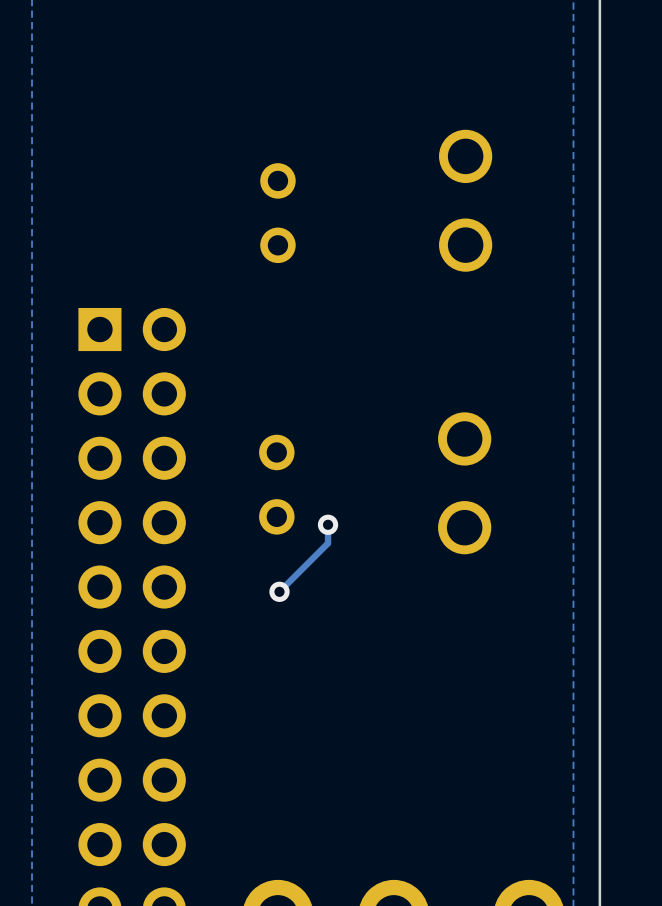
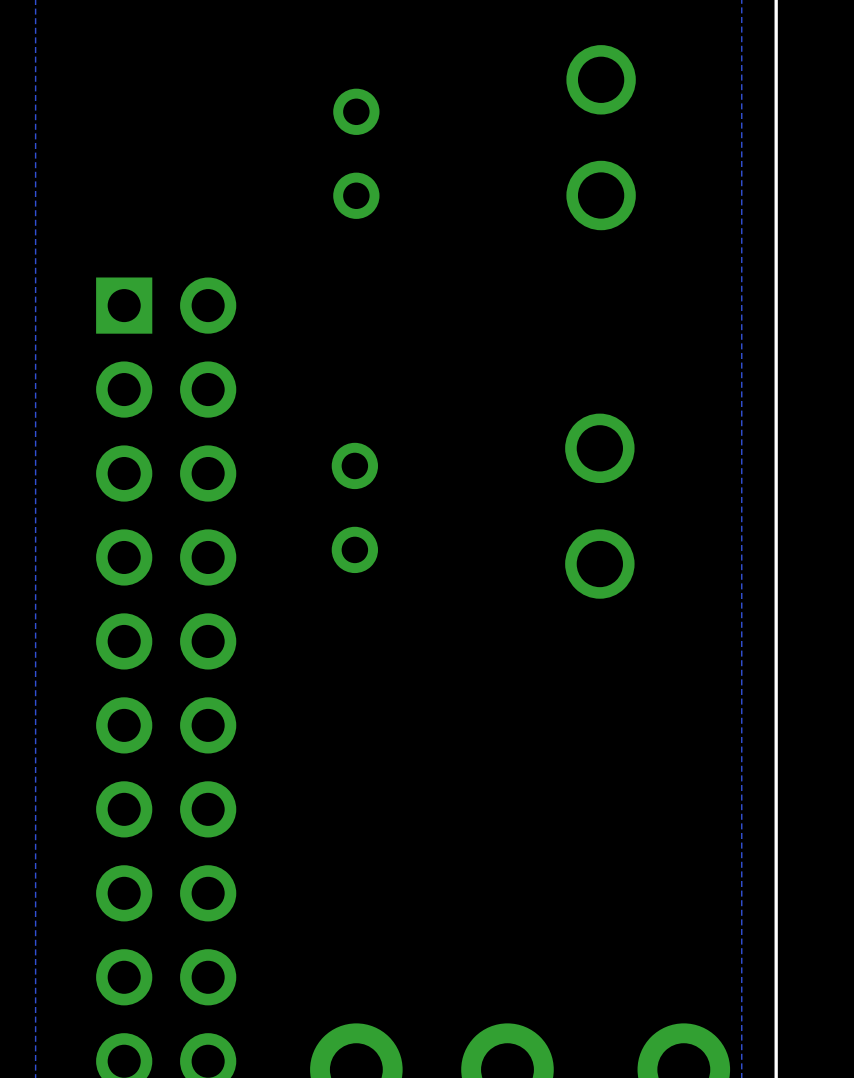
track: (328, 524) (328, 543) (279, 591) -> none
via: (328, 524) -> none
via: (279, 591) -> none

